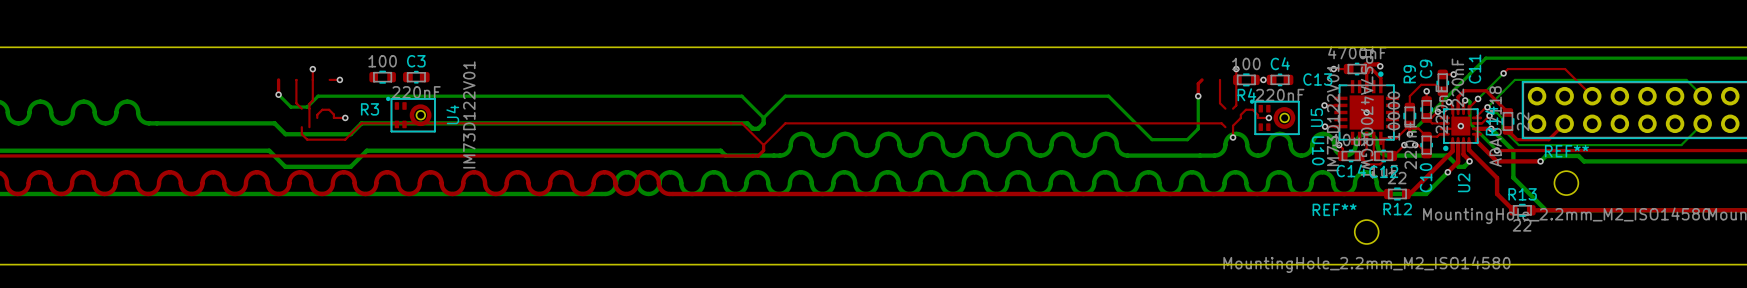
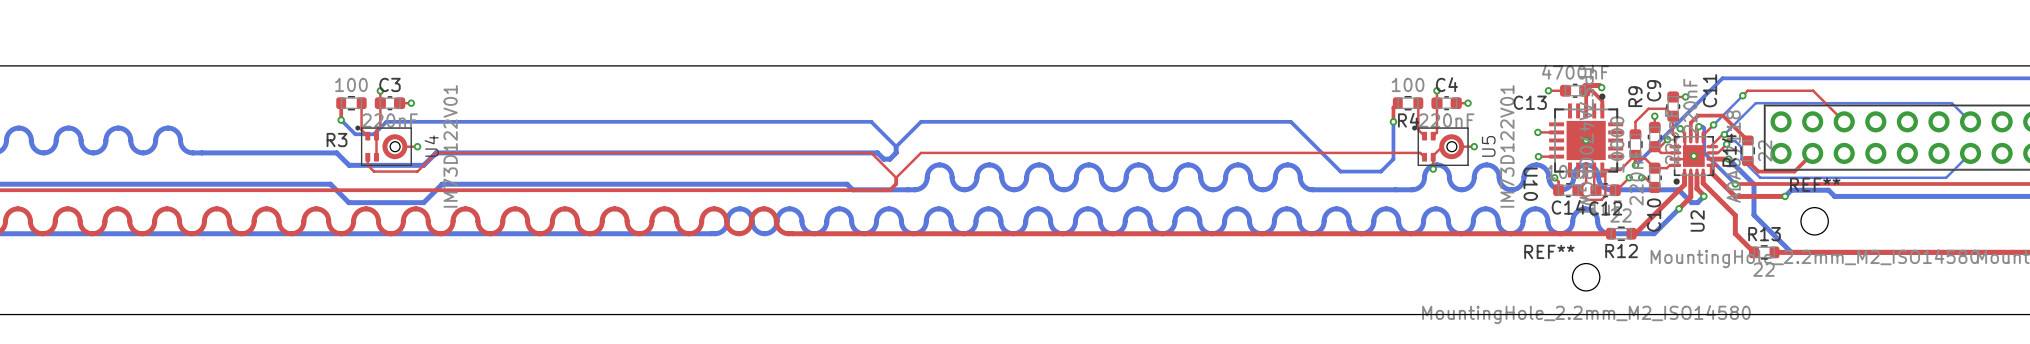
R3 position: (382, 77) -> (351, 103)
C3 position: (416, 77) -> (390, 103)
R4 position: (1246, 79) -> (1408, 103)
C4 position: (1280, 79) -> (1446, 103)
U4 position: (410, 114) -> (383, 145)
U5 position: (1274, 116) -> (1440, 145)

